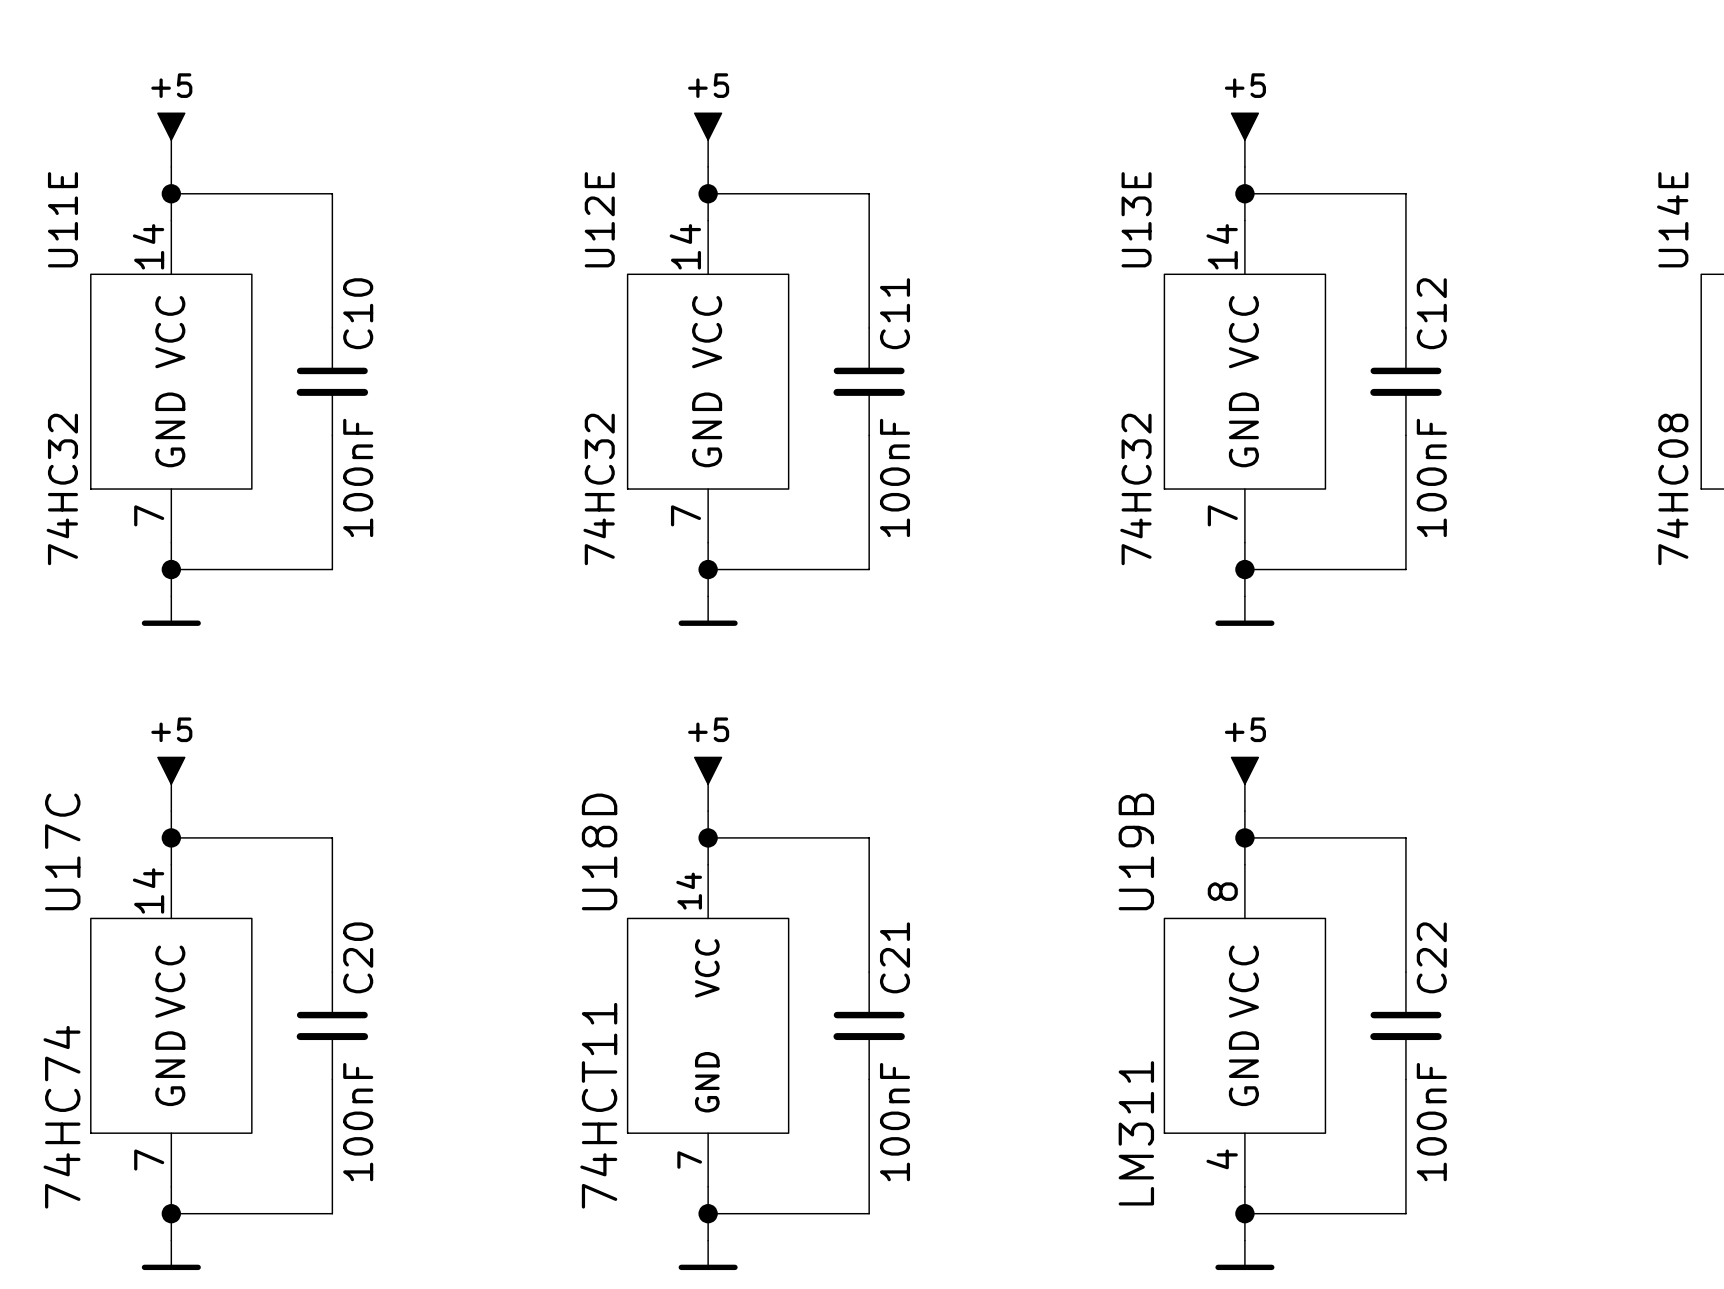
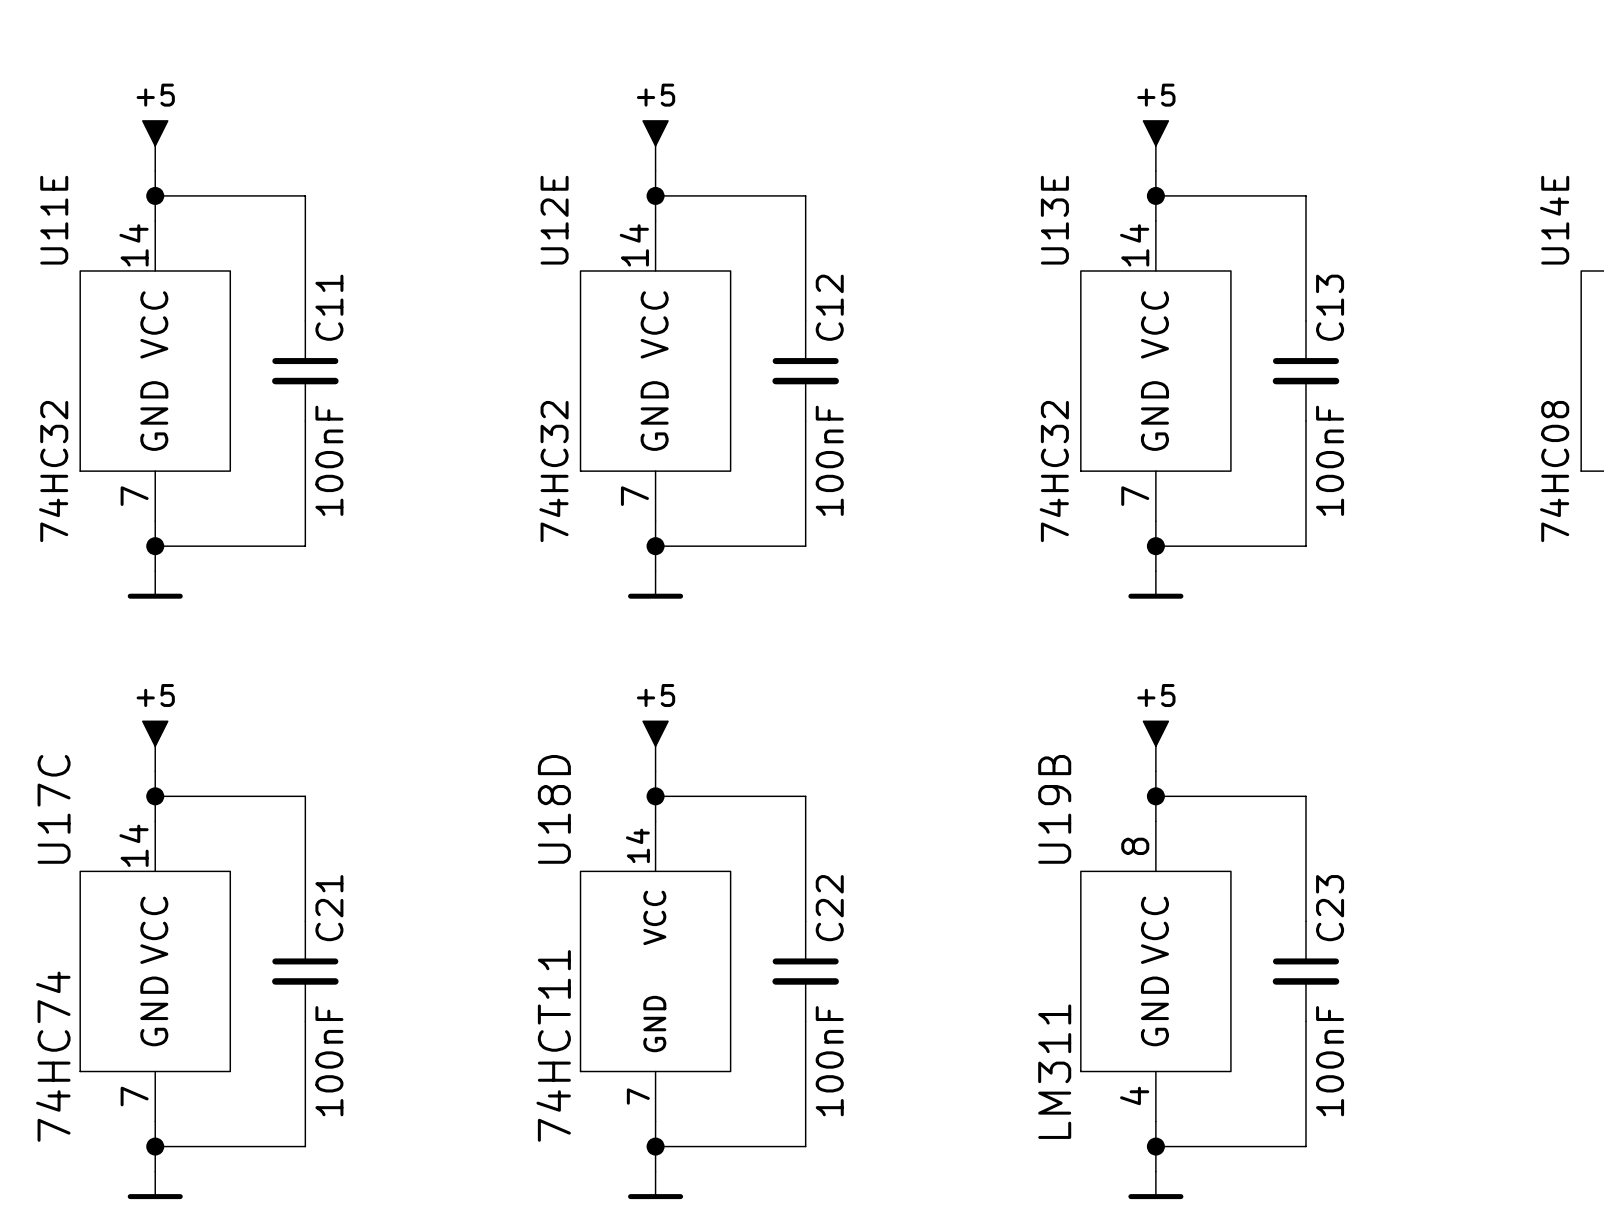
C10 name: C10 (358, 313) -> C11 (329, 307)
C11 name: C11 (895, 313) -> C12 (829, 307)
C12 name: C12 (1431, 313) -> C13 (1330, 307)
C20 name: C20 (358, 957) -> C21 (329, 908)
C21 name: C21 (895, 957) -> C22 (829, 908)
C22 name: C22 (1431, 957) -> C23 (1330, 908)

